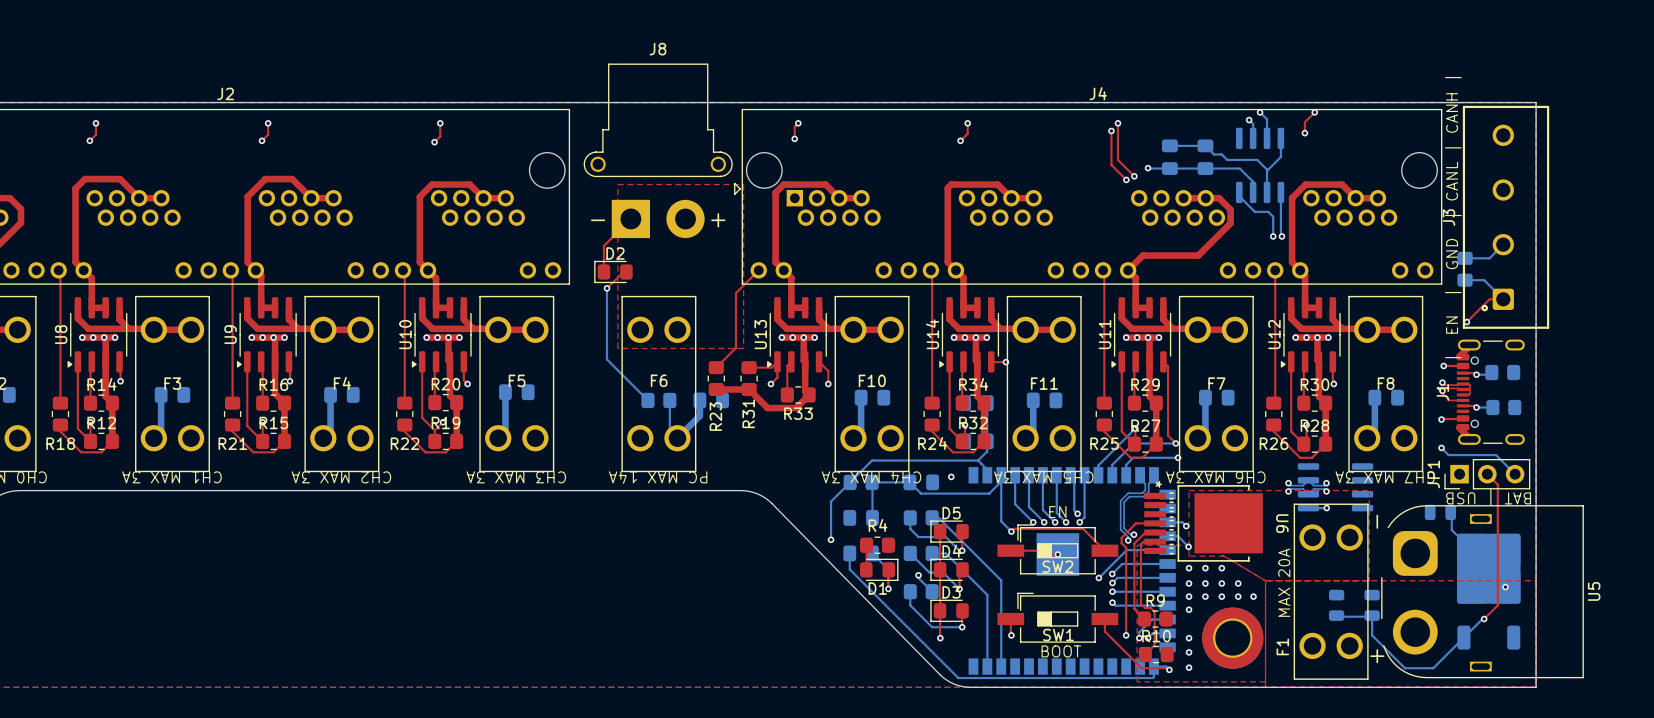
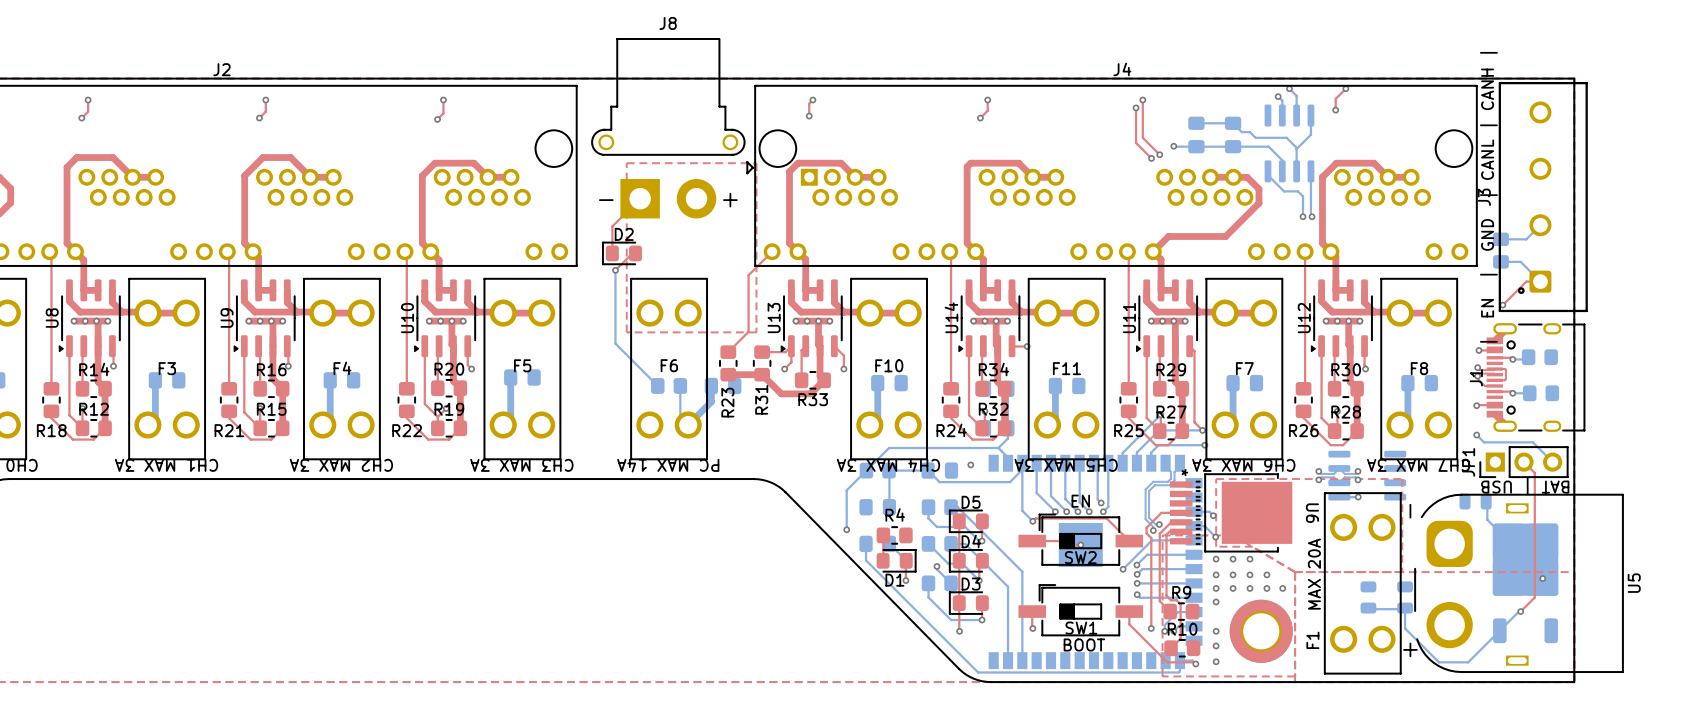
J1 footprint: [1456, 339, 1525, 445] -> [1486, 323, 1586, 432]

